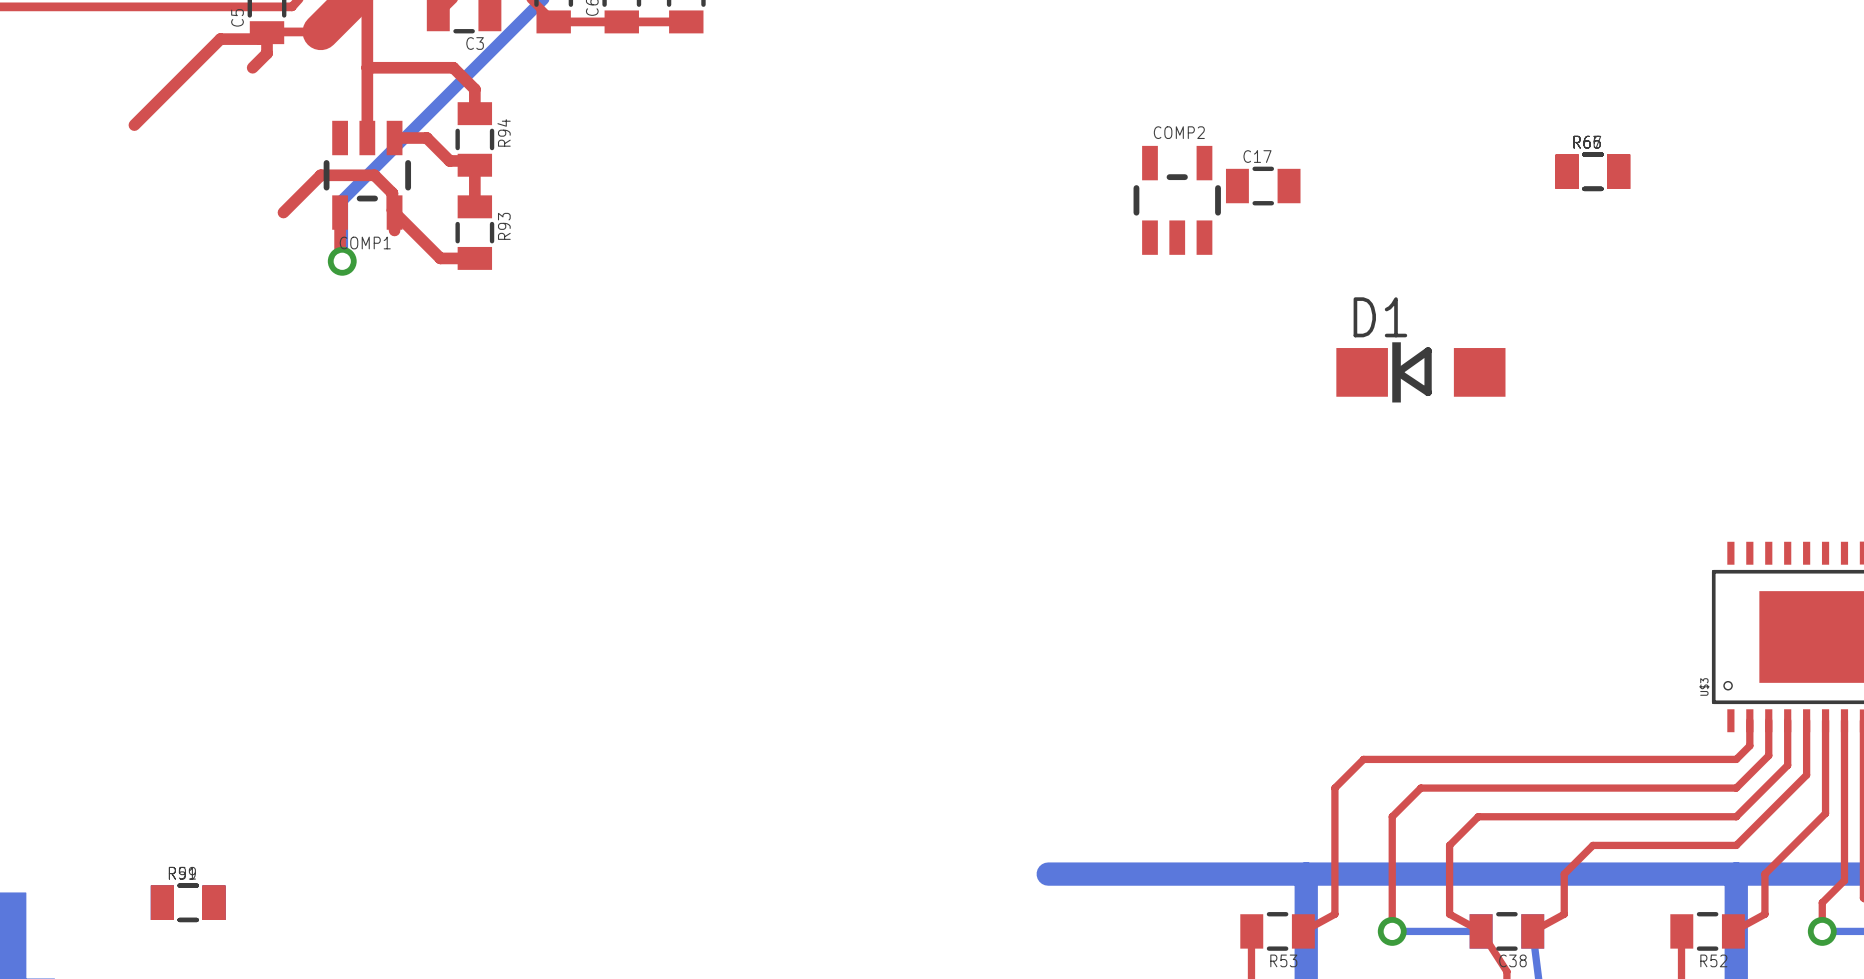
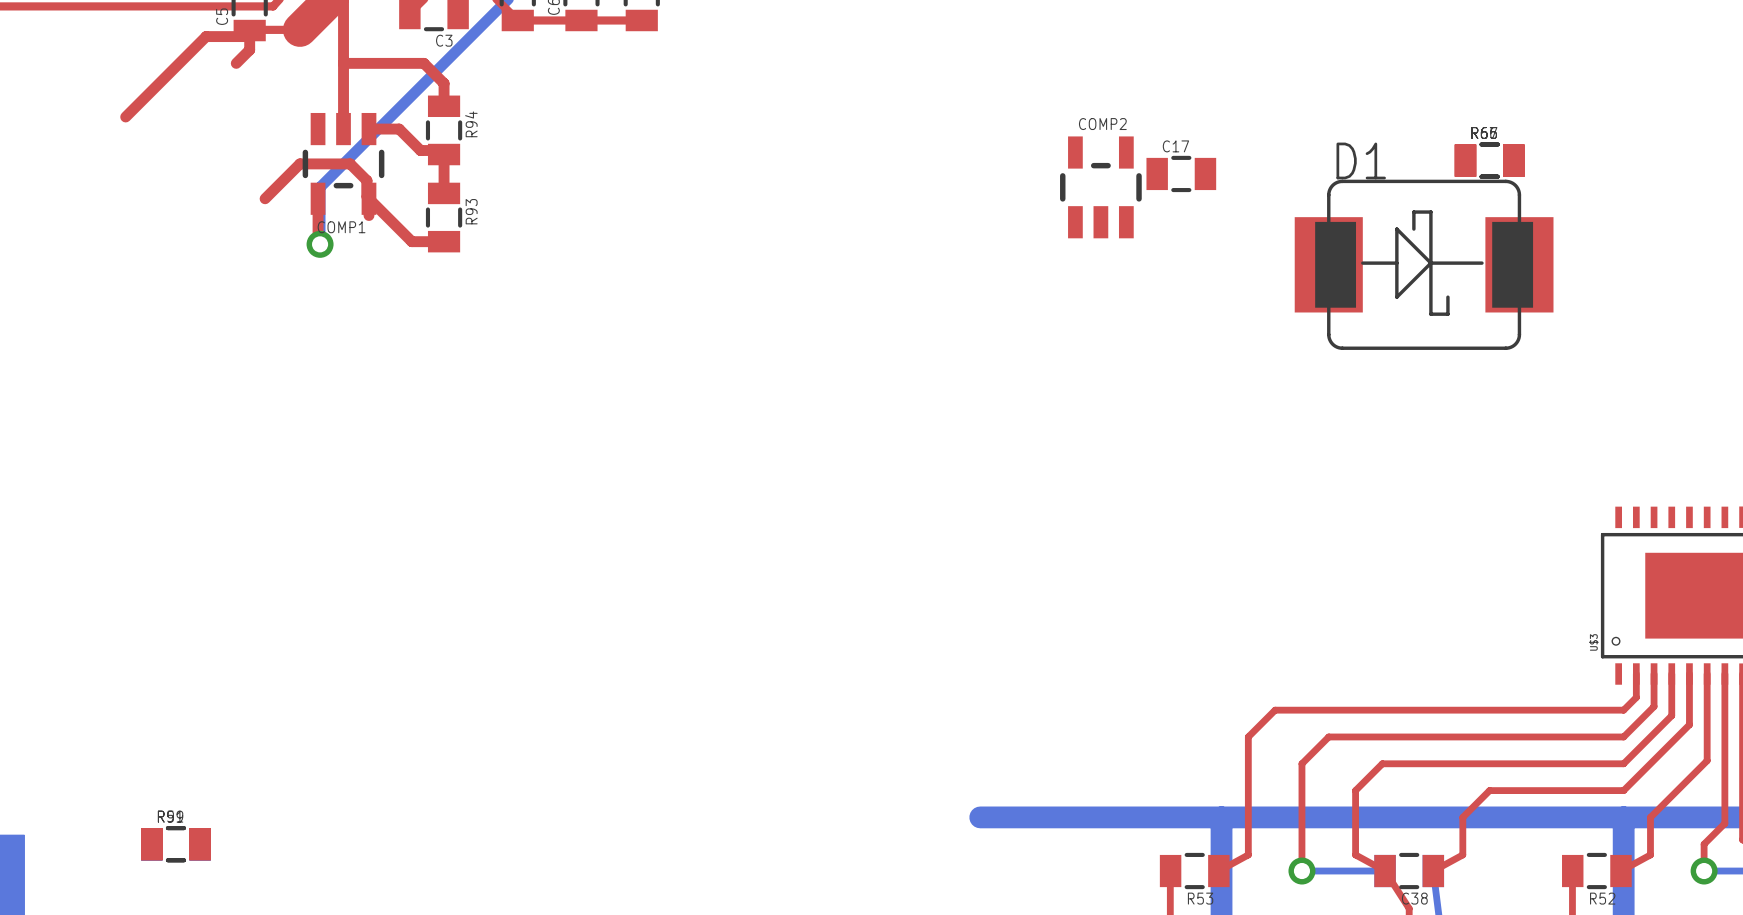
D1 name position: D1 (1380, 317) -> D1 (1361, 160)
D1 footprint: [1336, 342, 1506, 403] -> [1294, 179, 1554, 350]

